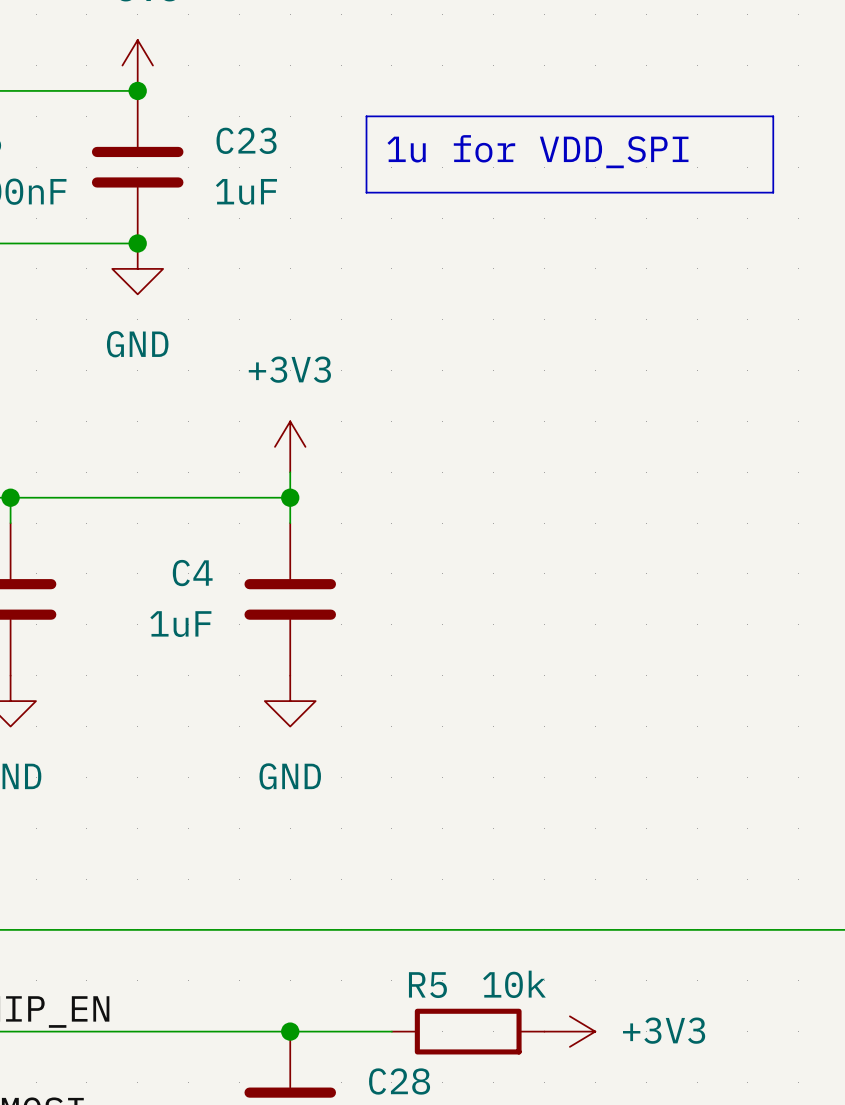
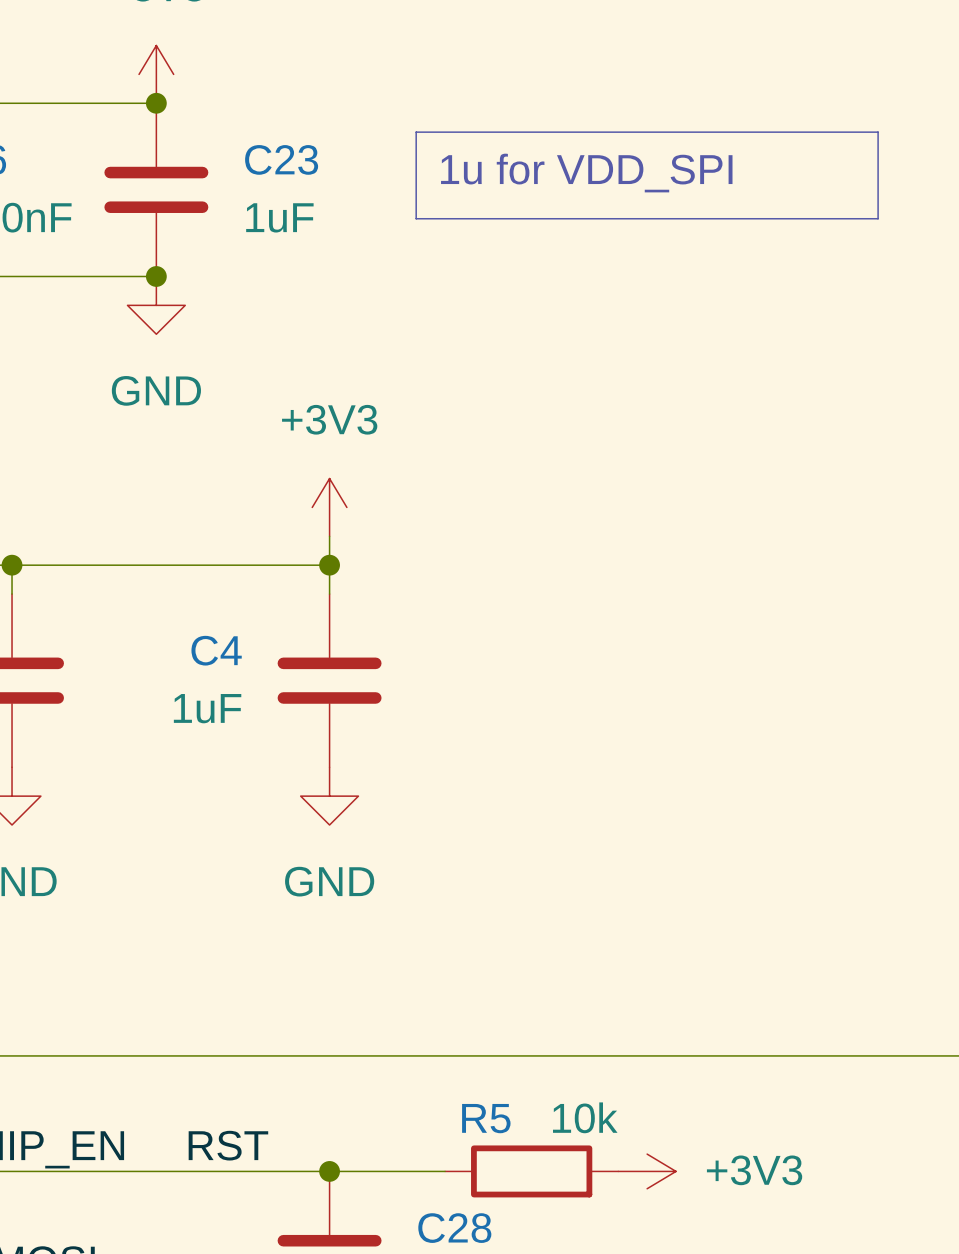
label: none -> RST (228, 1145)

